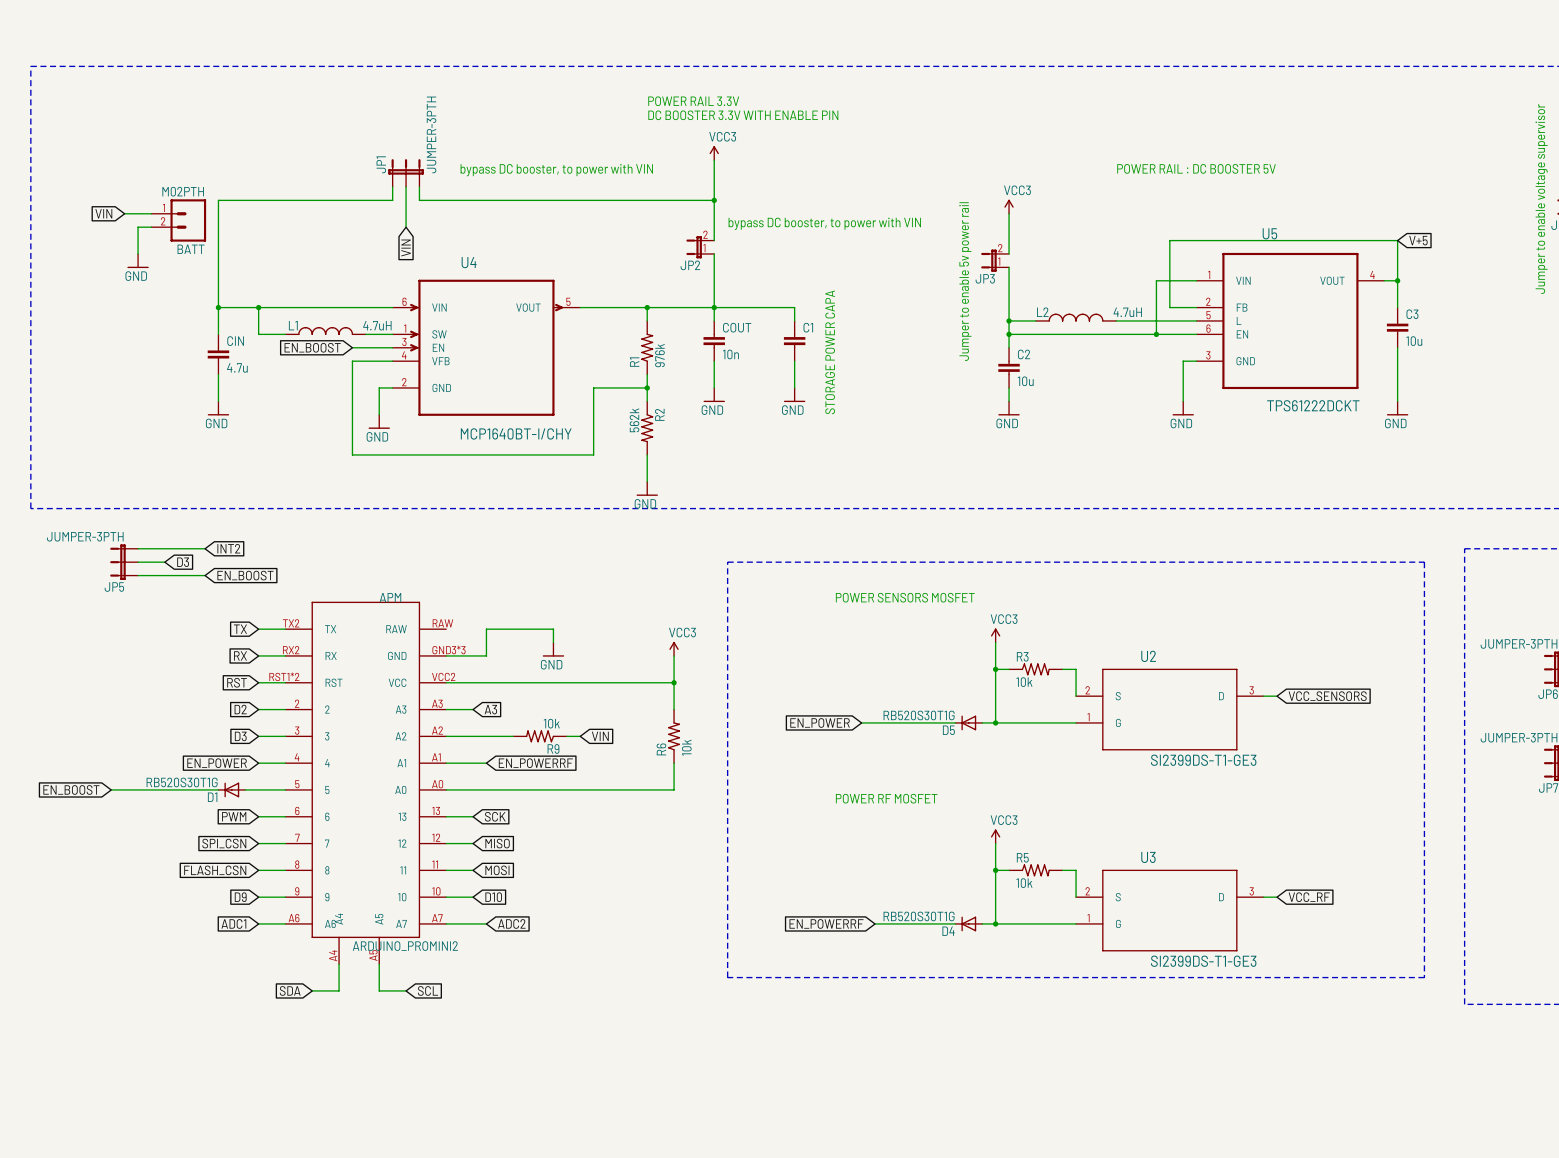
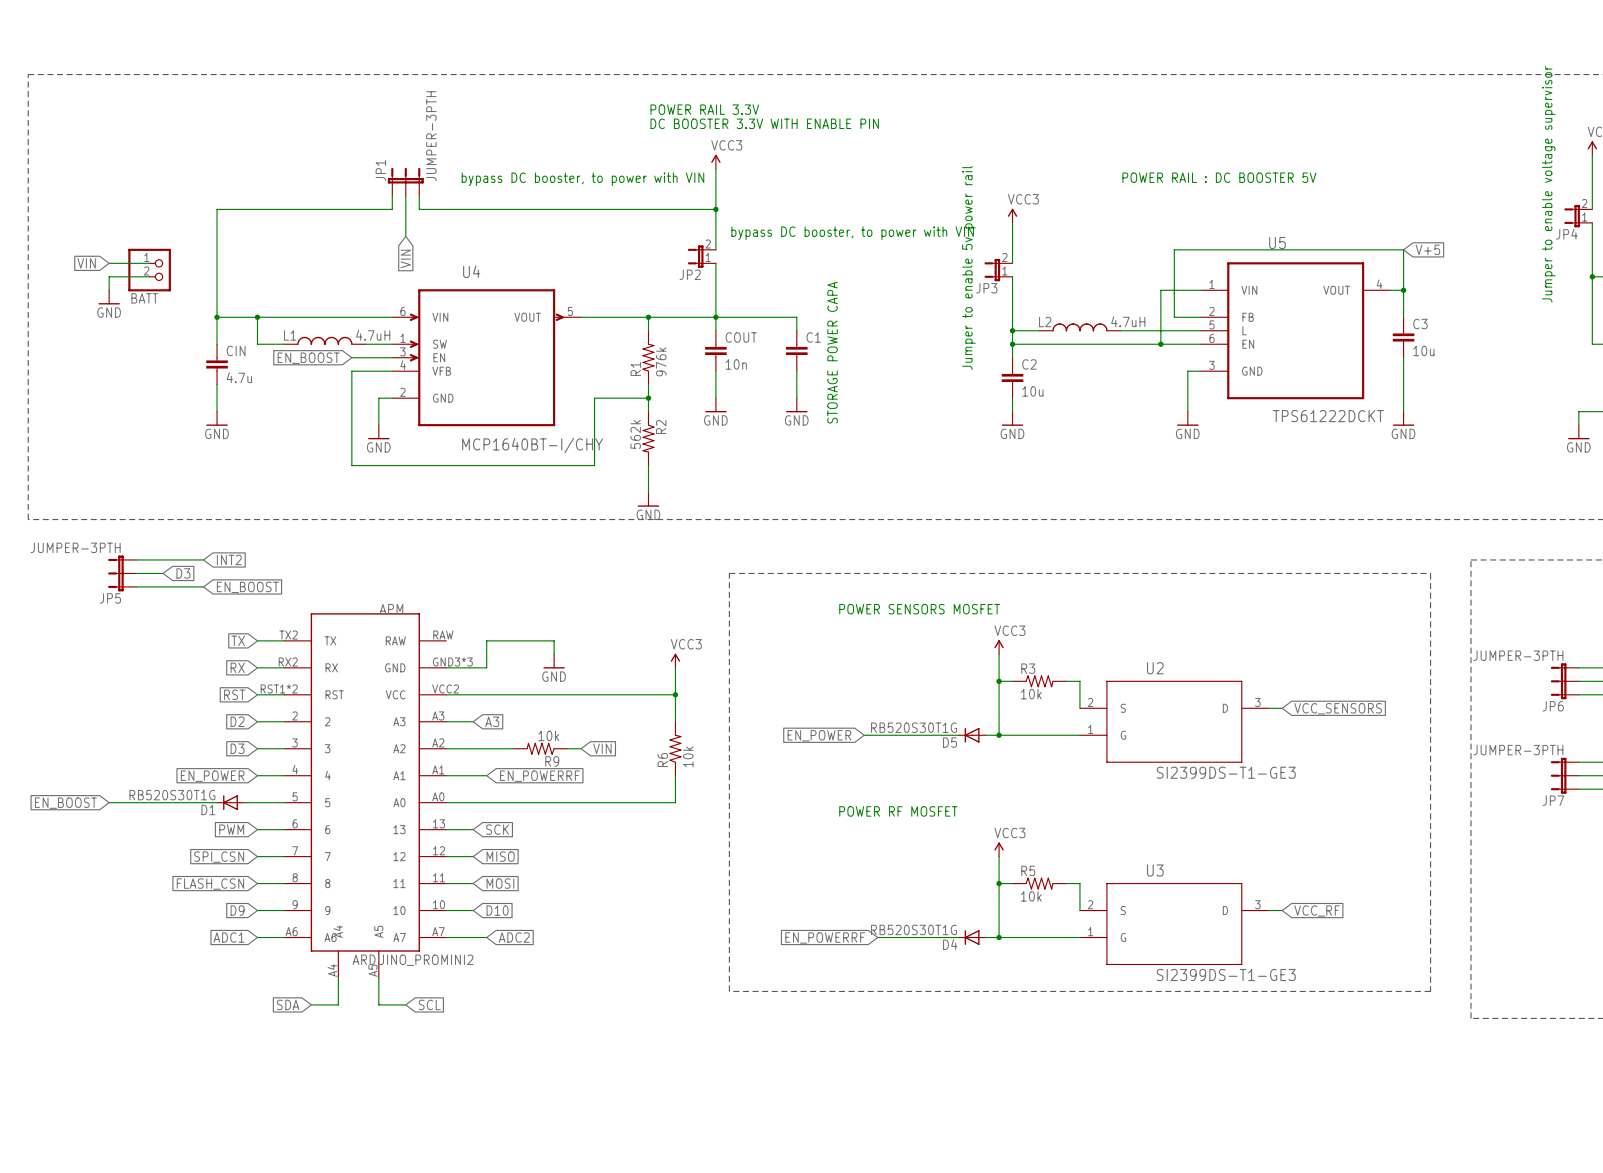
global label position: VIN (103, 213) -> VIN (86, 263)
wire: (124, 213) (151, 213) -> none
BATT: M02PTH (178, 220) -> none
wire: (151, 227) (138, 227) (138, 253) -> none
wire: none -> (109, 263) (149, 263)
BATT: none -> (149, 270)
power symbol position: GND (138, 261) -> GND (109, 297)
wire: none -> (149, 276) (109, 276) (109, 290)

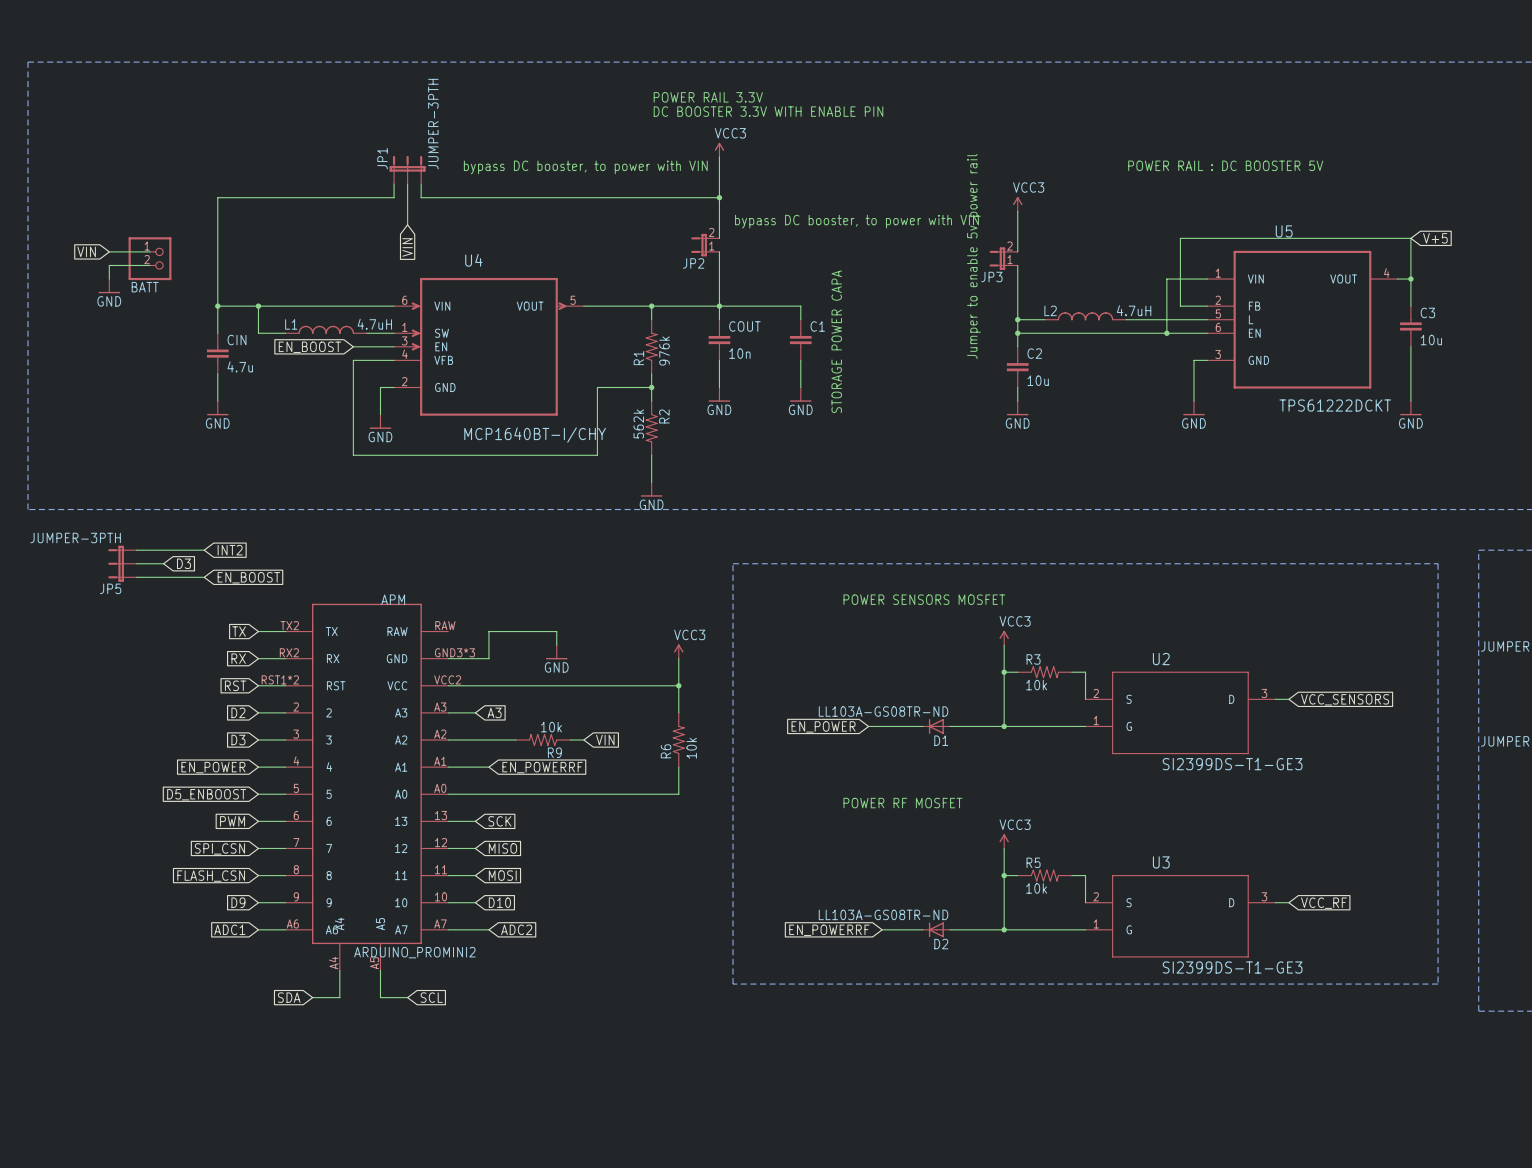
D5: RB520S30T1G (972, 735) -> none
D1 value: RB520S30T1G (172, 795) -> LL103A-GS08TR-ND (883, 711)
wire: (109, 802) (217, 802) -> none
D1 position: (230, 802) -> (936, 726)
wire: (243, 802) (257, 802) -> none
global label: EN_BOOST (65, 803) -> none
global label: none -> D5_ENBOOST (206, 794)
D1 name position: D1 (208, 809) -> D1 (941, 740)
D2: none -> LL103A-GS08TR-ND (936, 929)
D4: RB520S30T1G (972, 937) -> none

